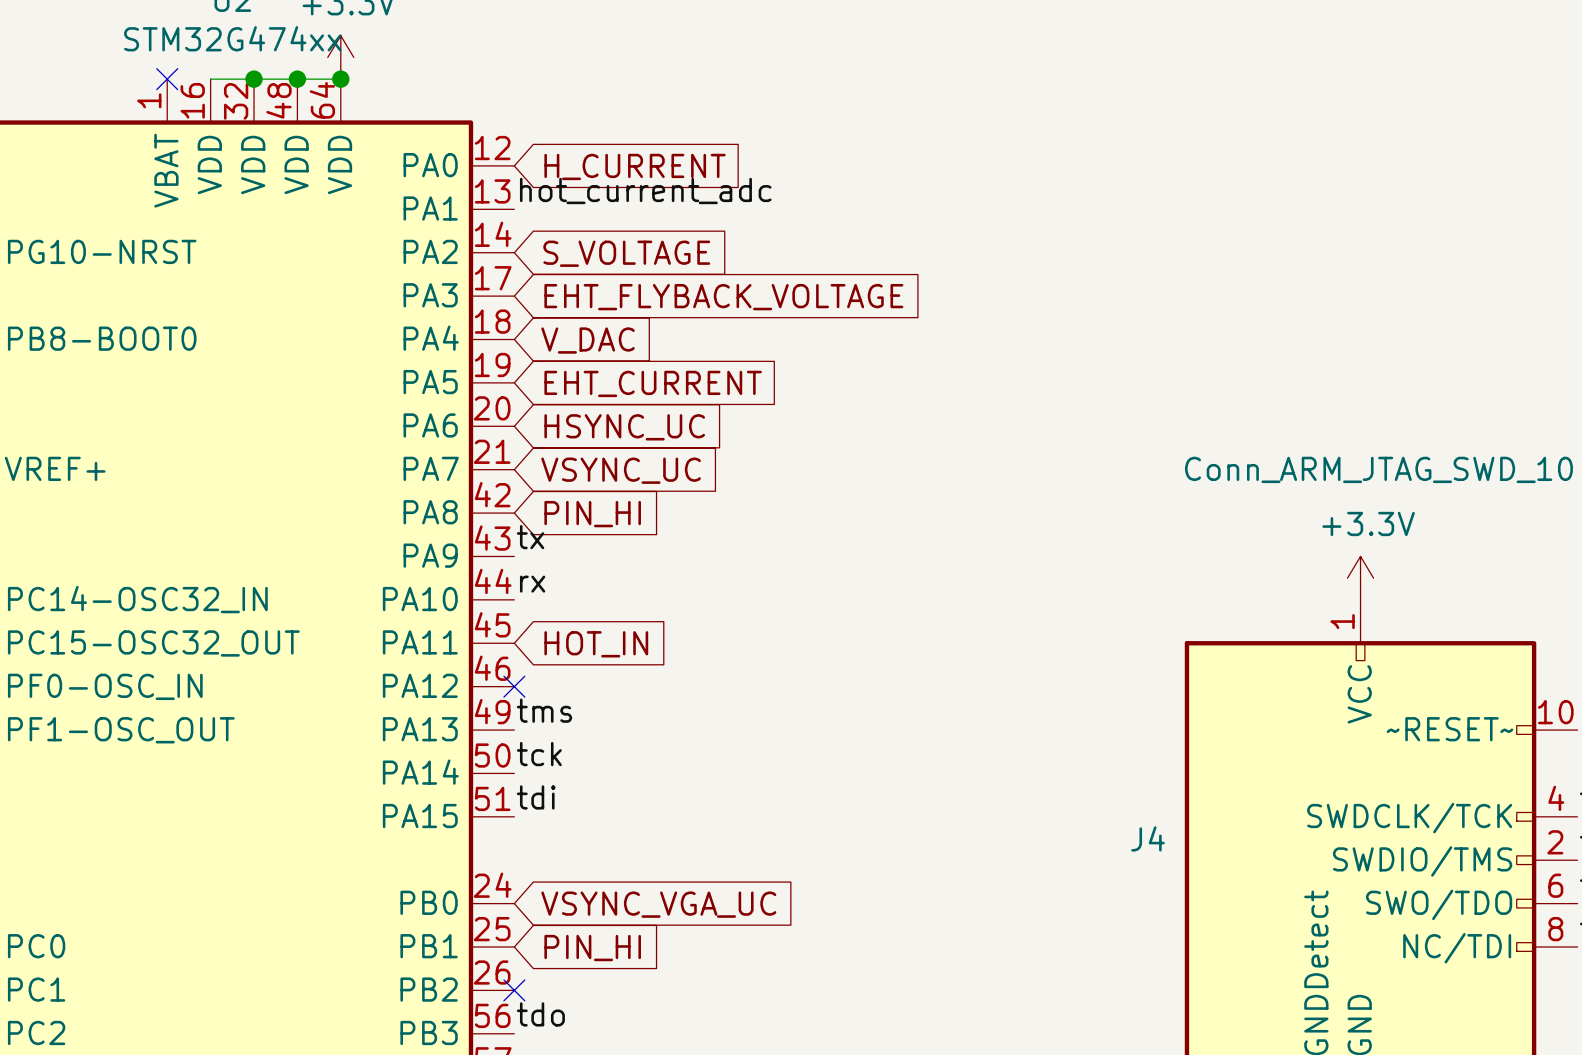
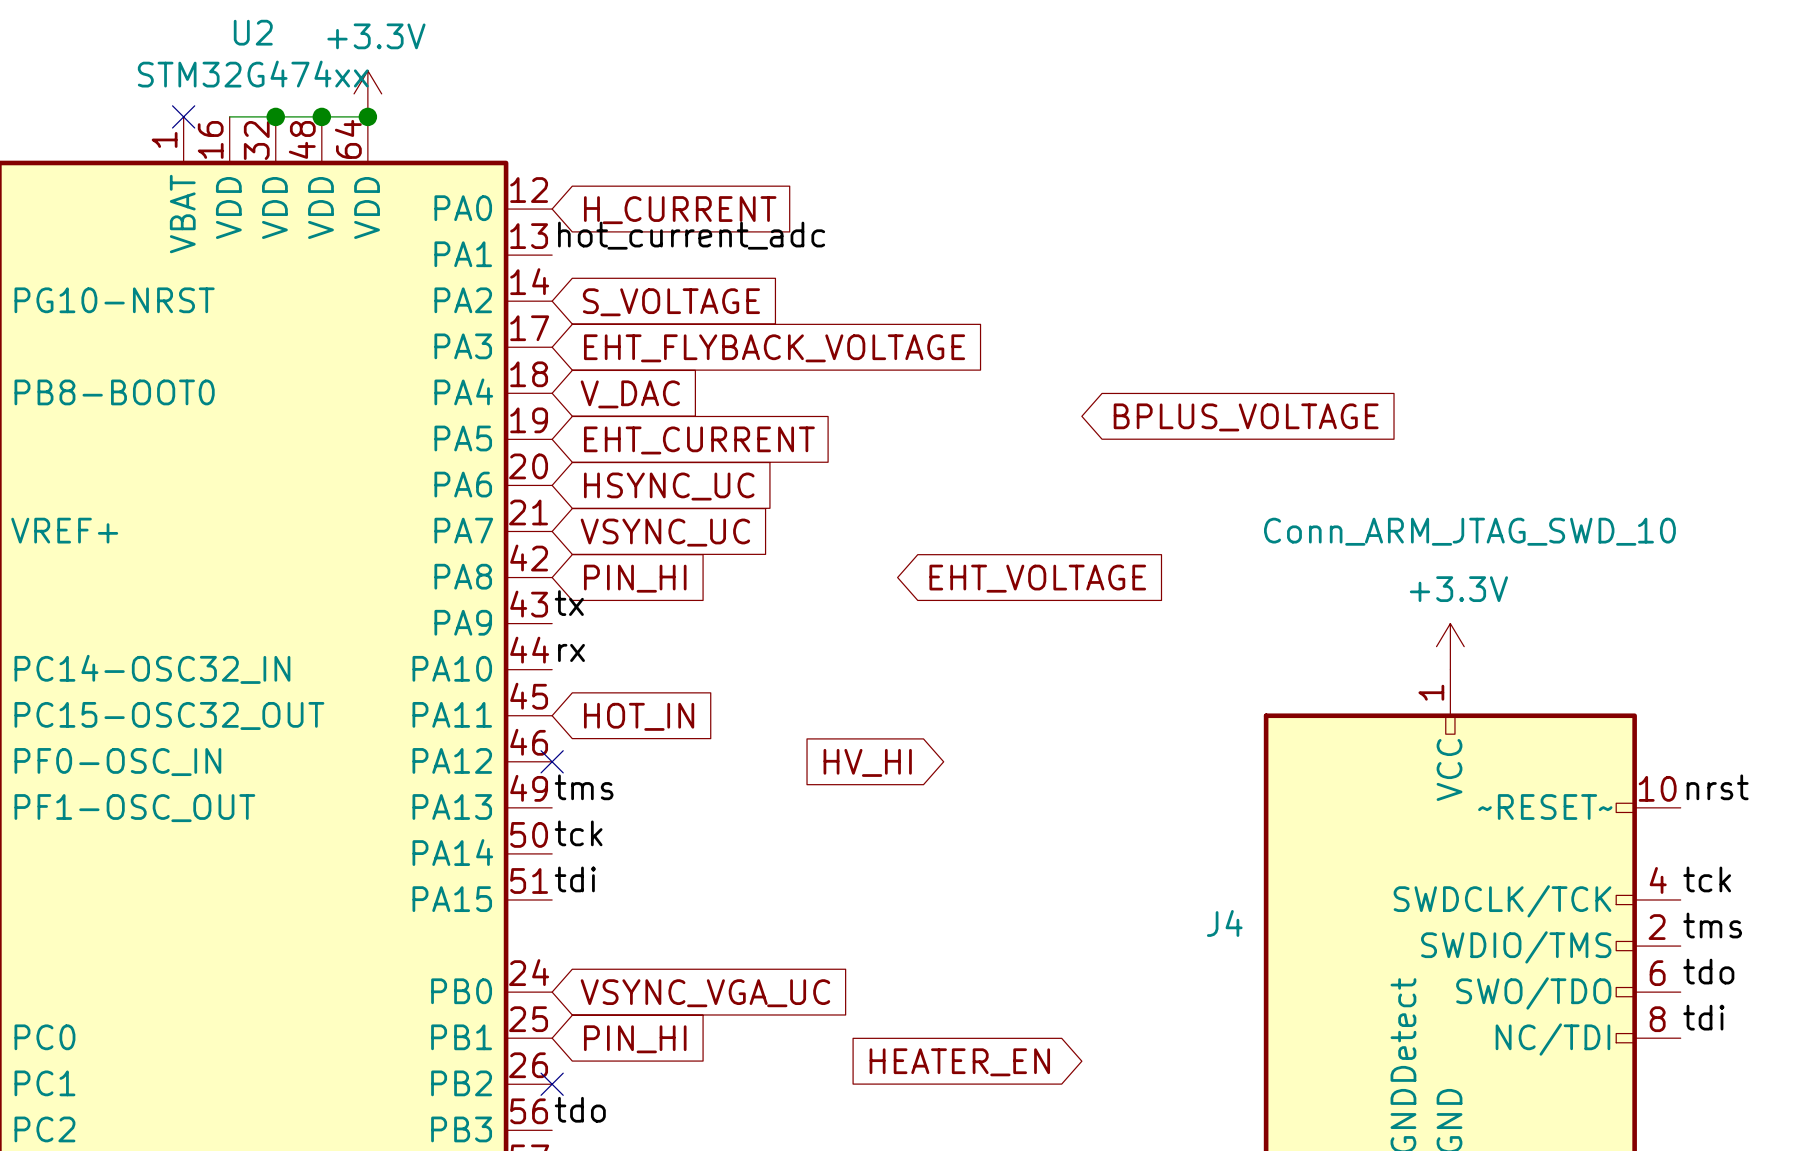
global label: none -> BPLUS_VOLTAGE (1246, 417)
global label: none -> EHT_VOLTAGE (1037, 578)
global label: none -> HV_HI (867, 762)
global label: none -> HEATER_EN (959, 1062)

